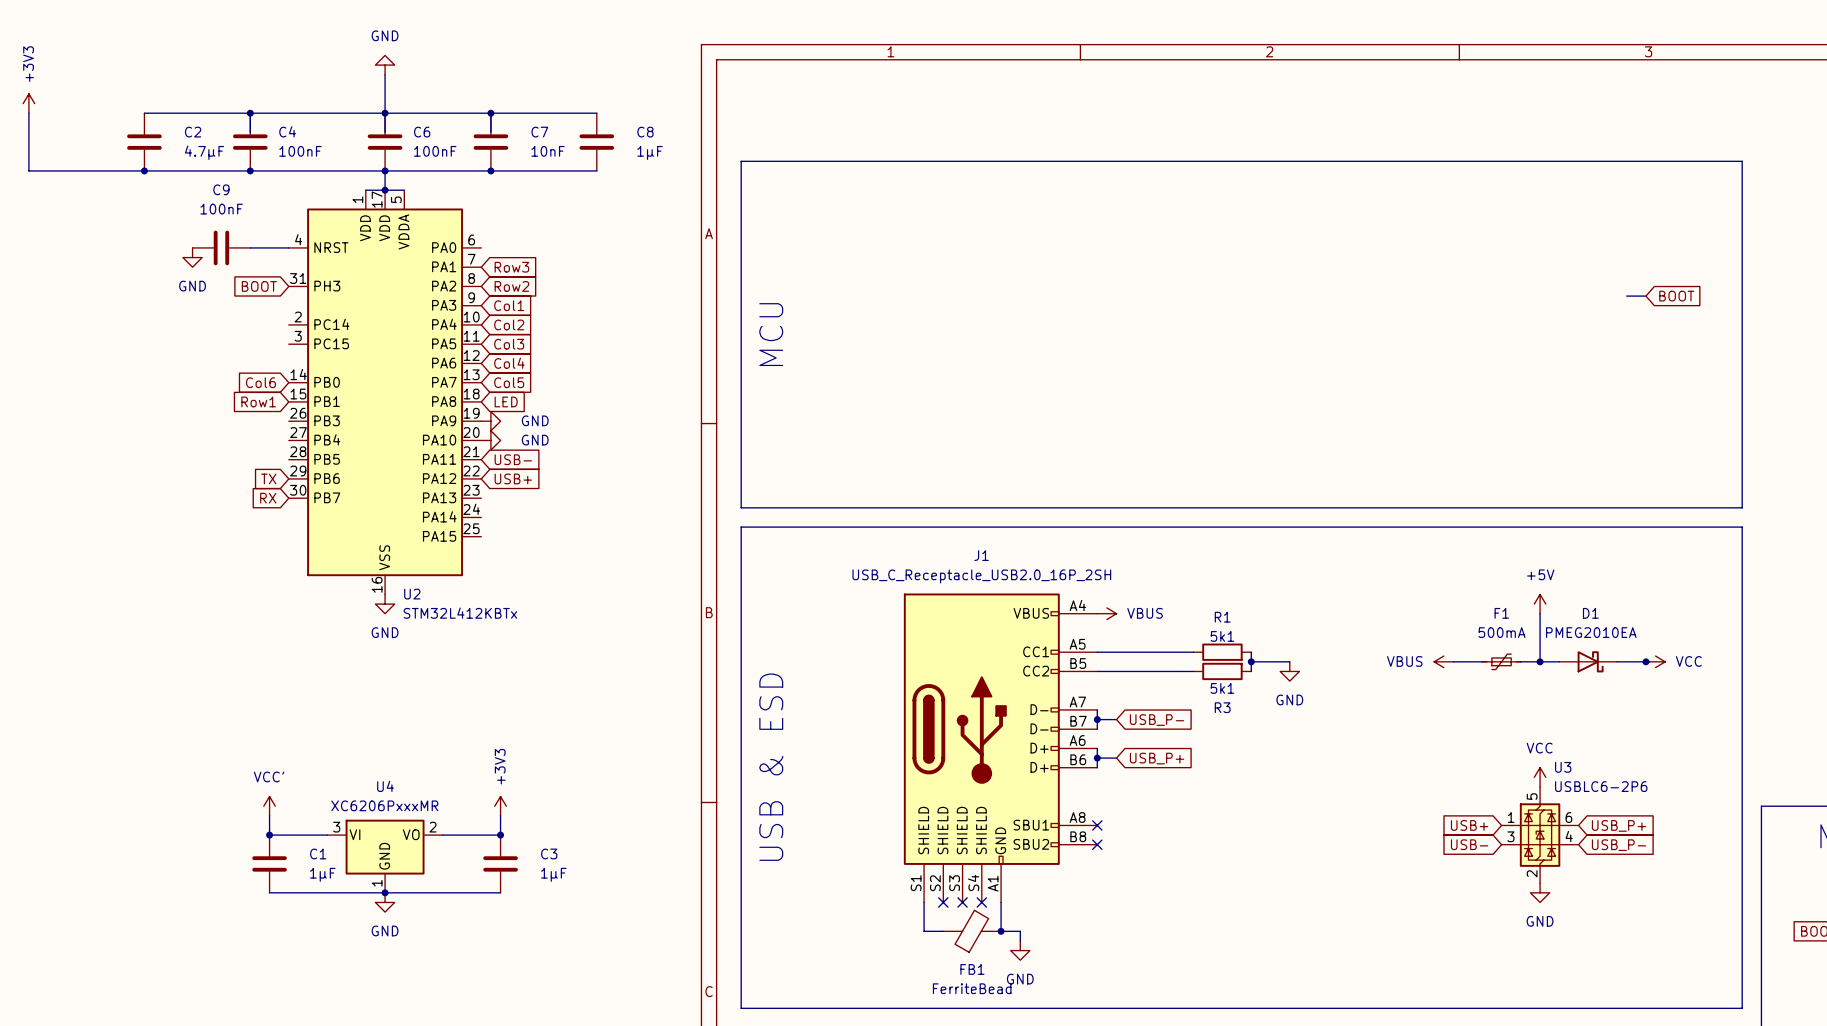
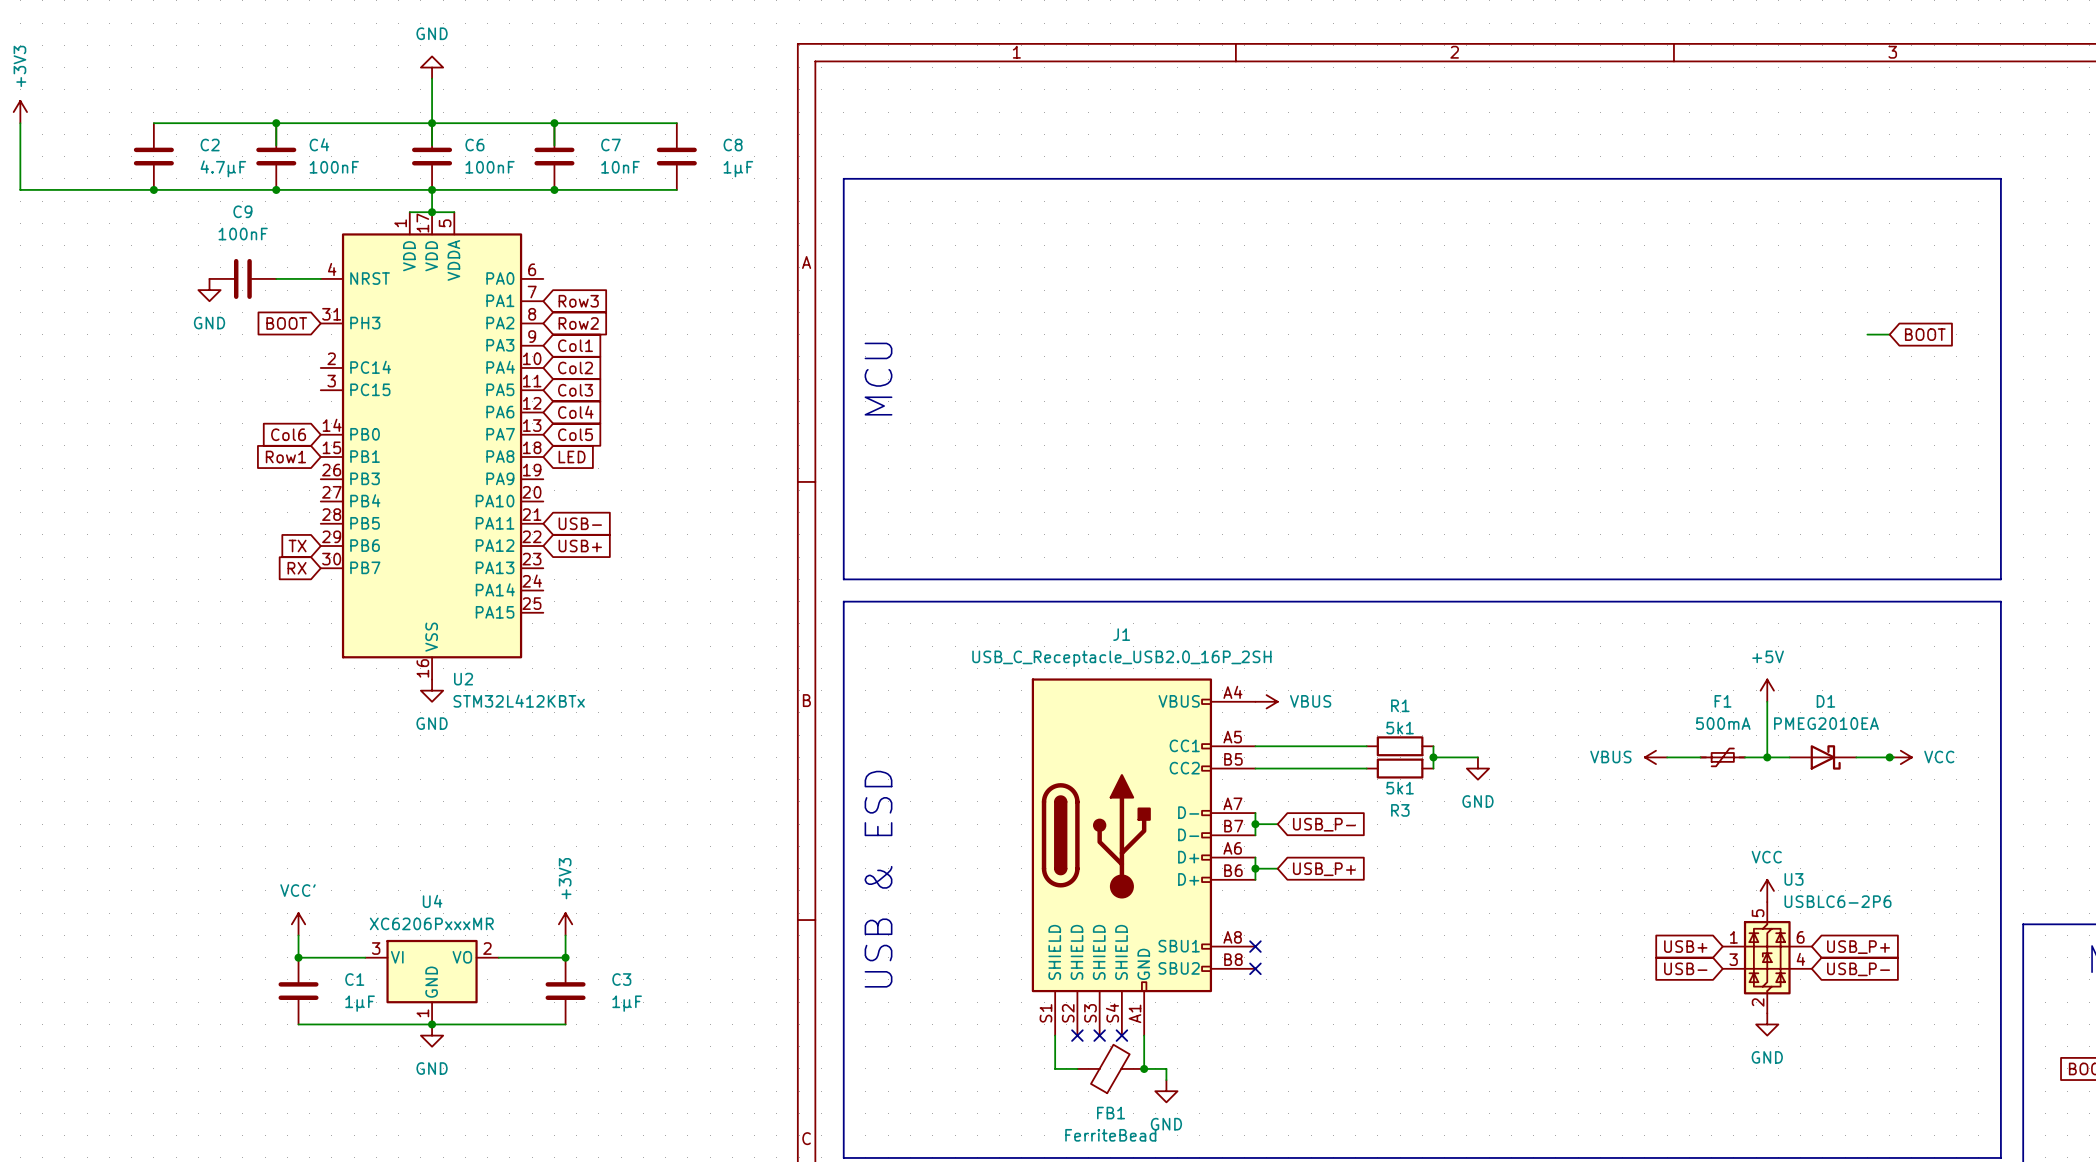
power symbol: GND (490, 421) -> none
power symbol: GND (490, 440) -> none

